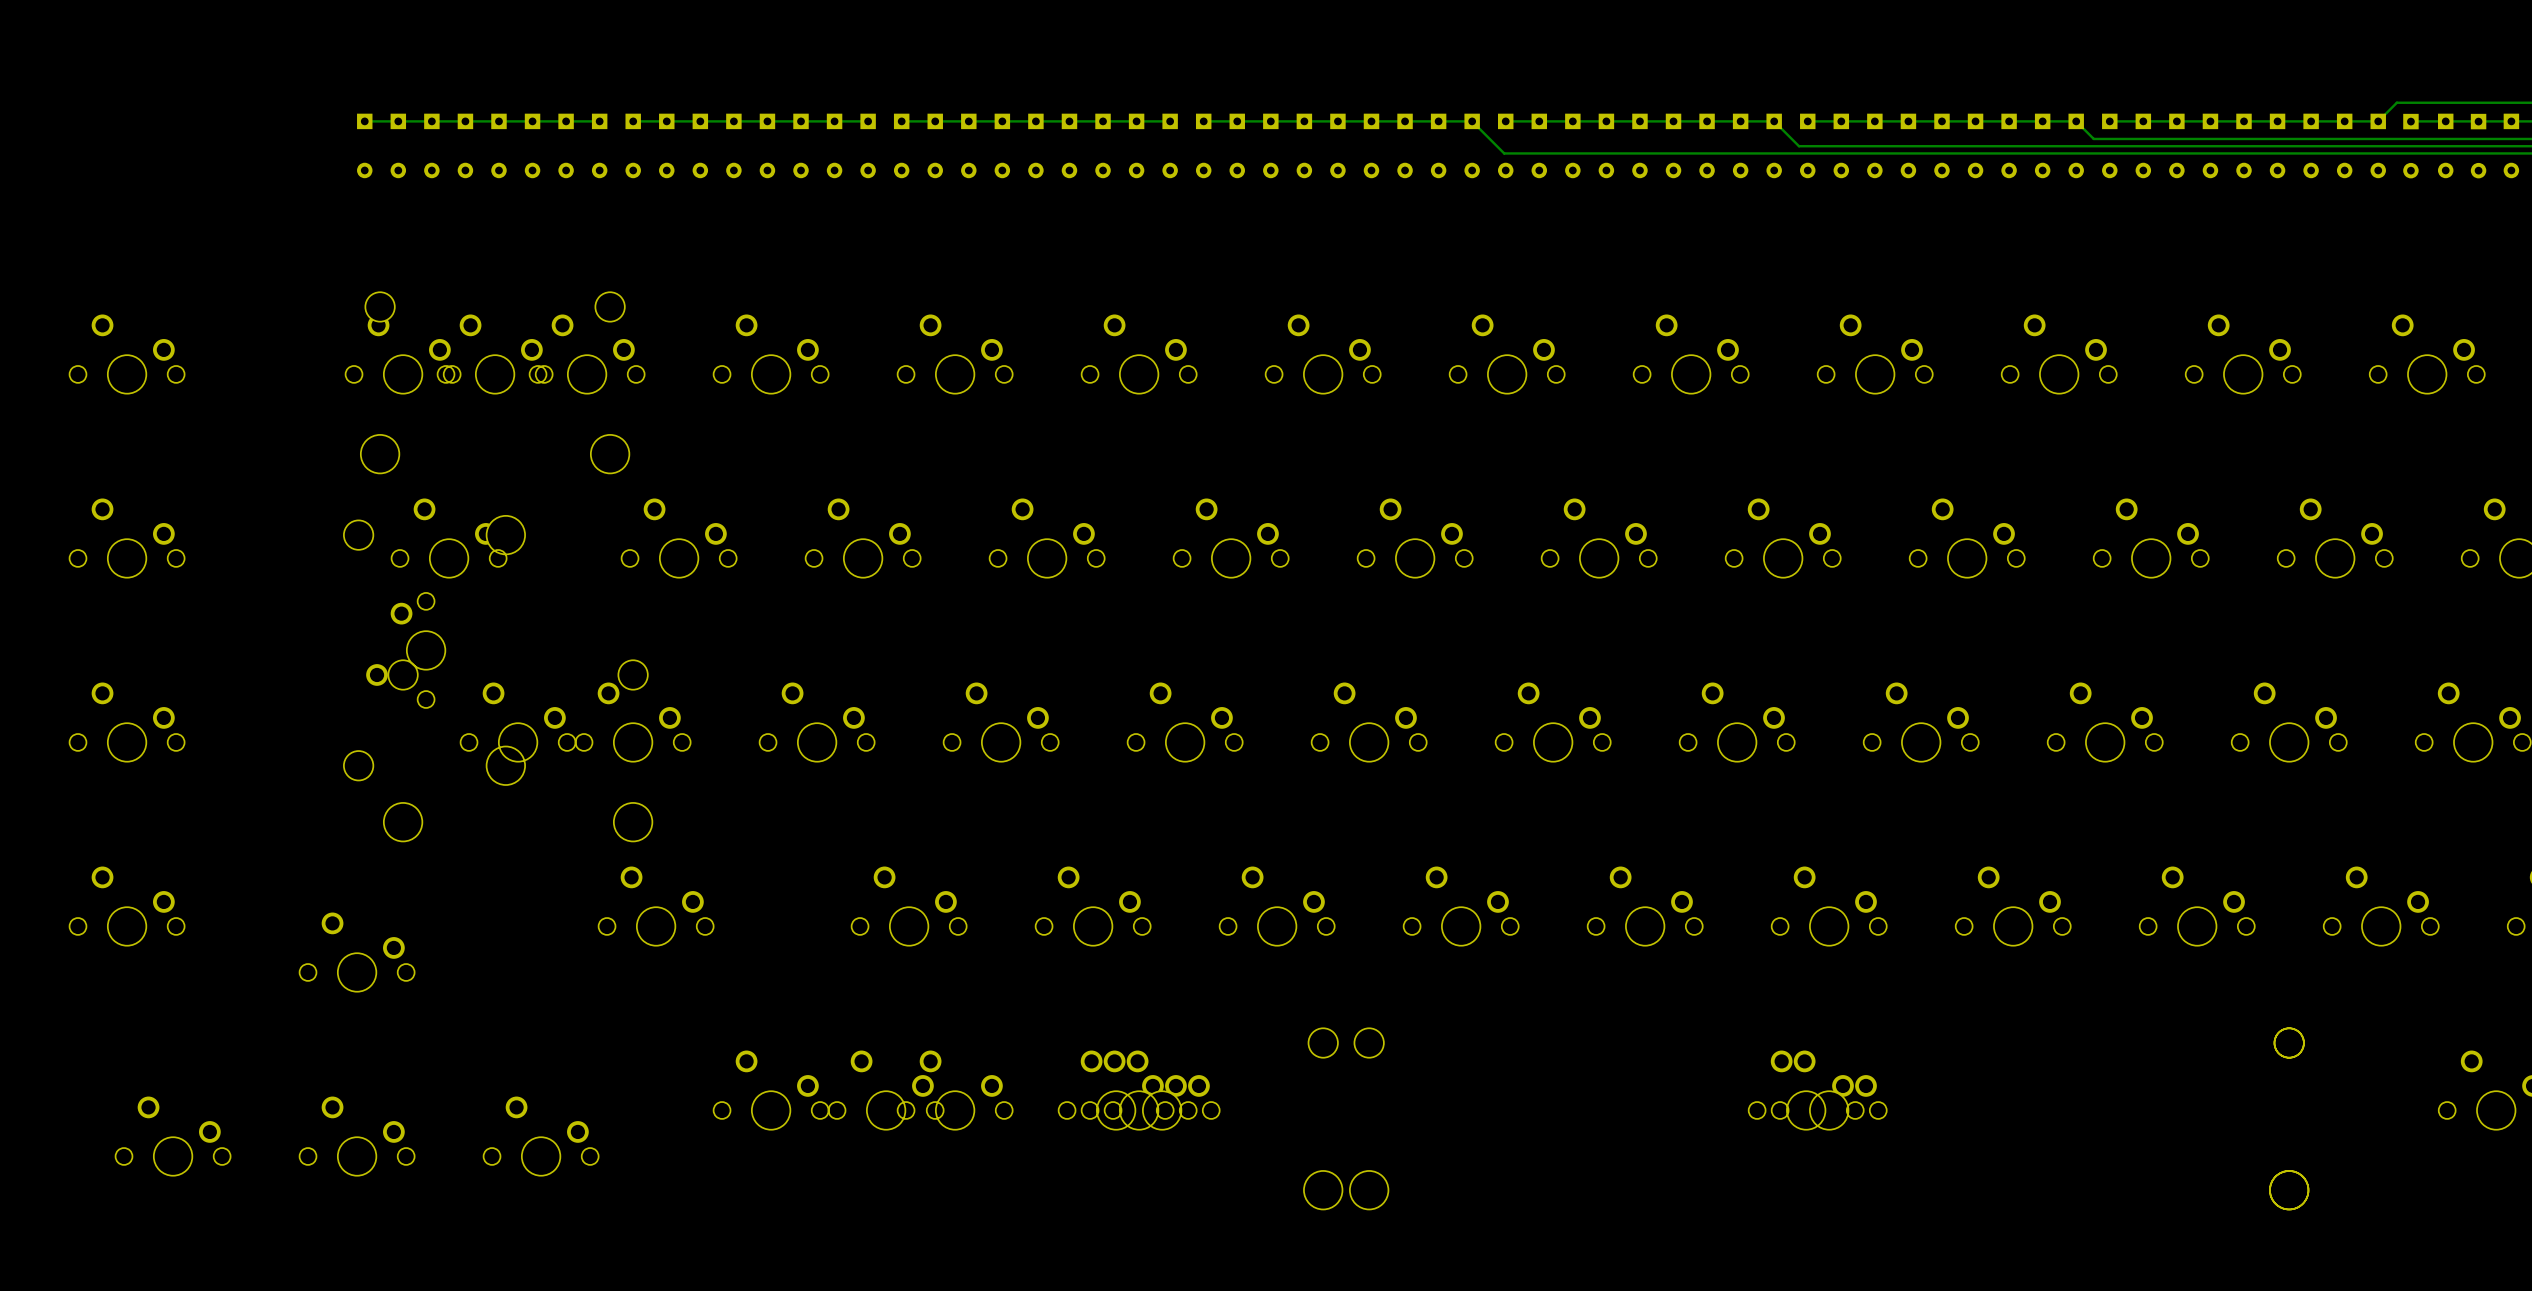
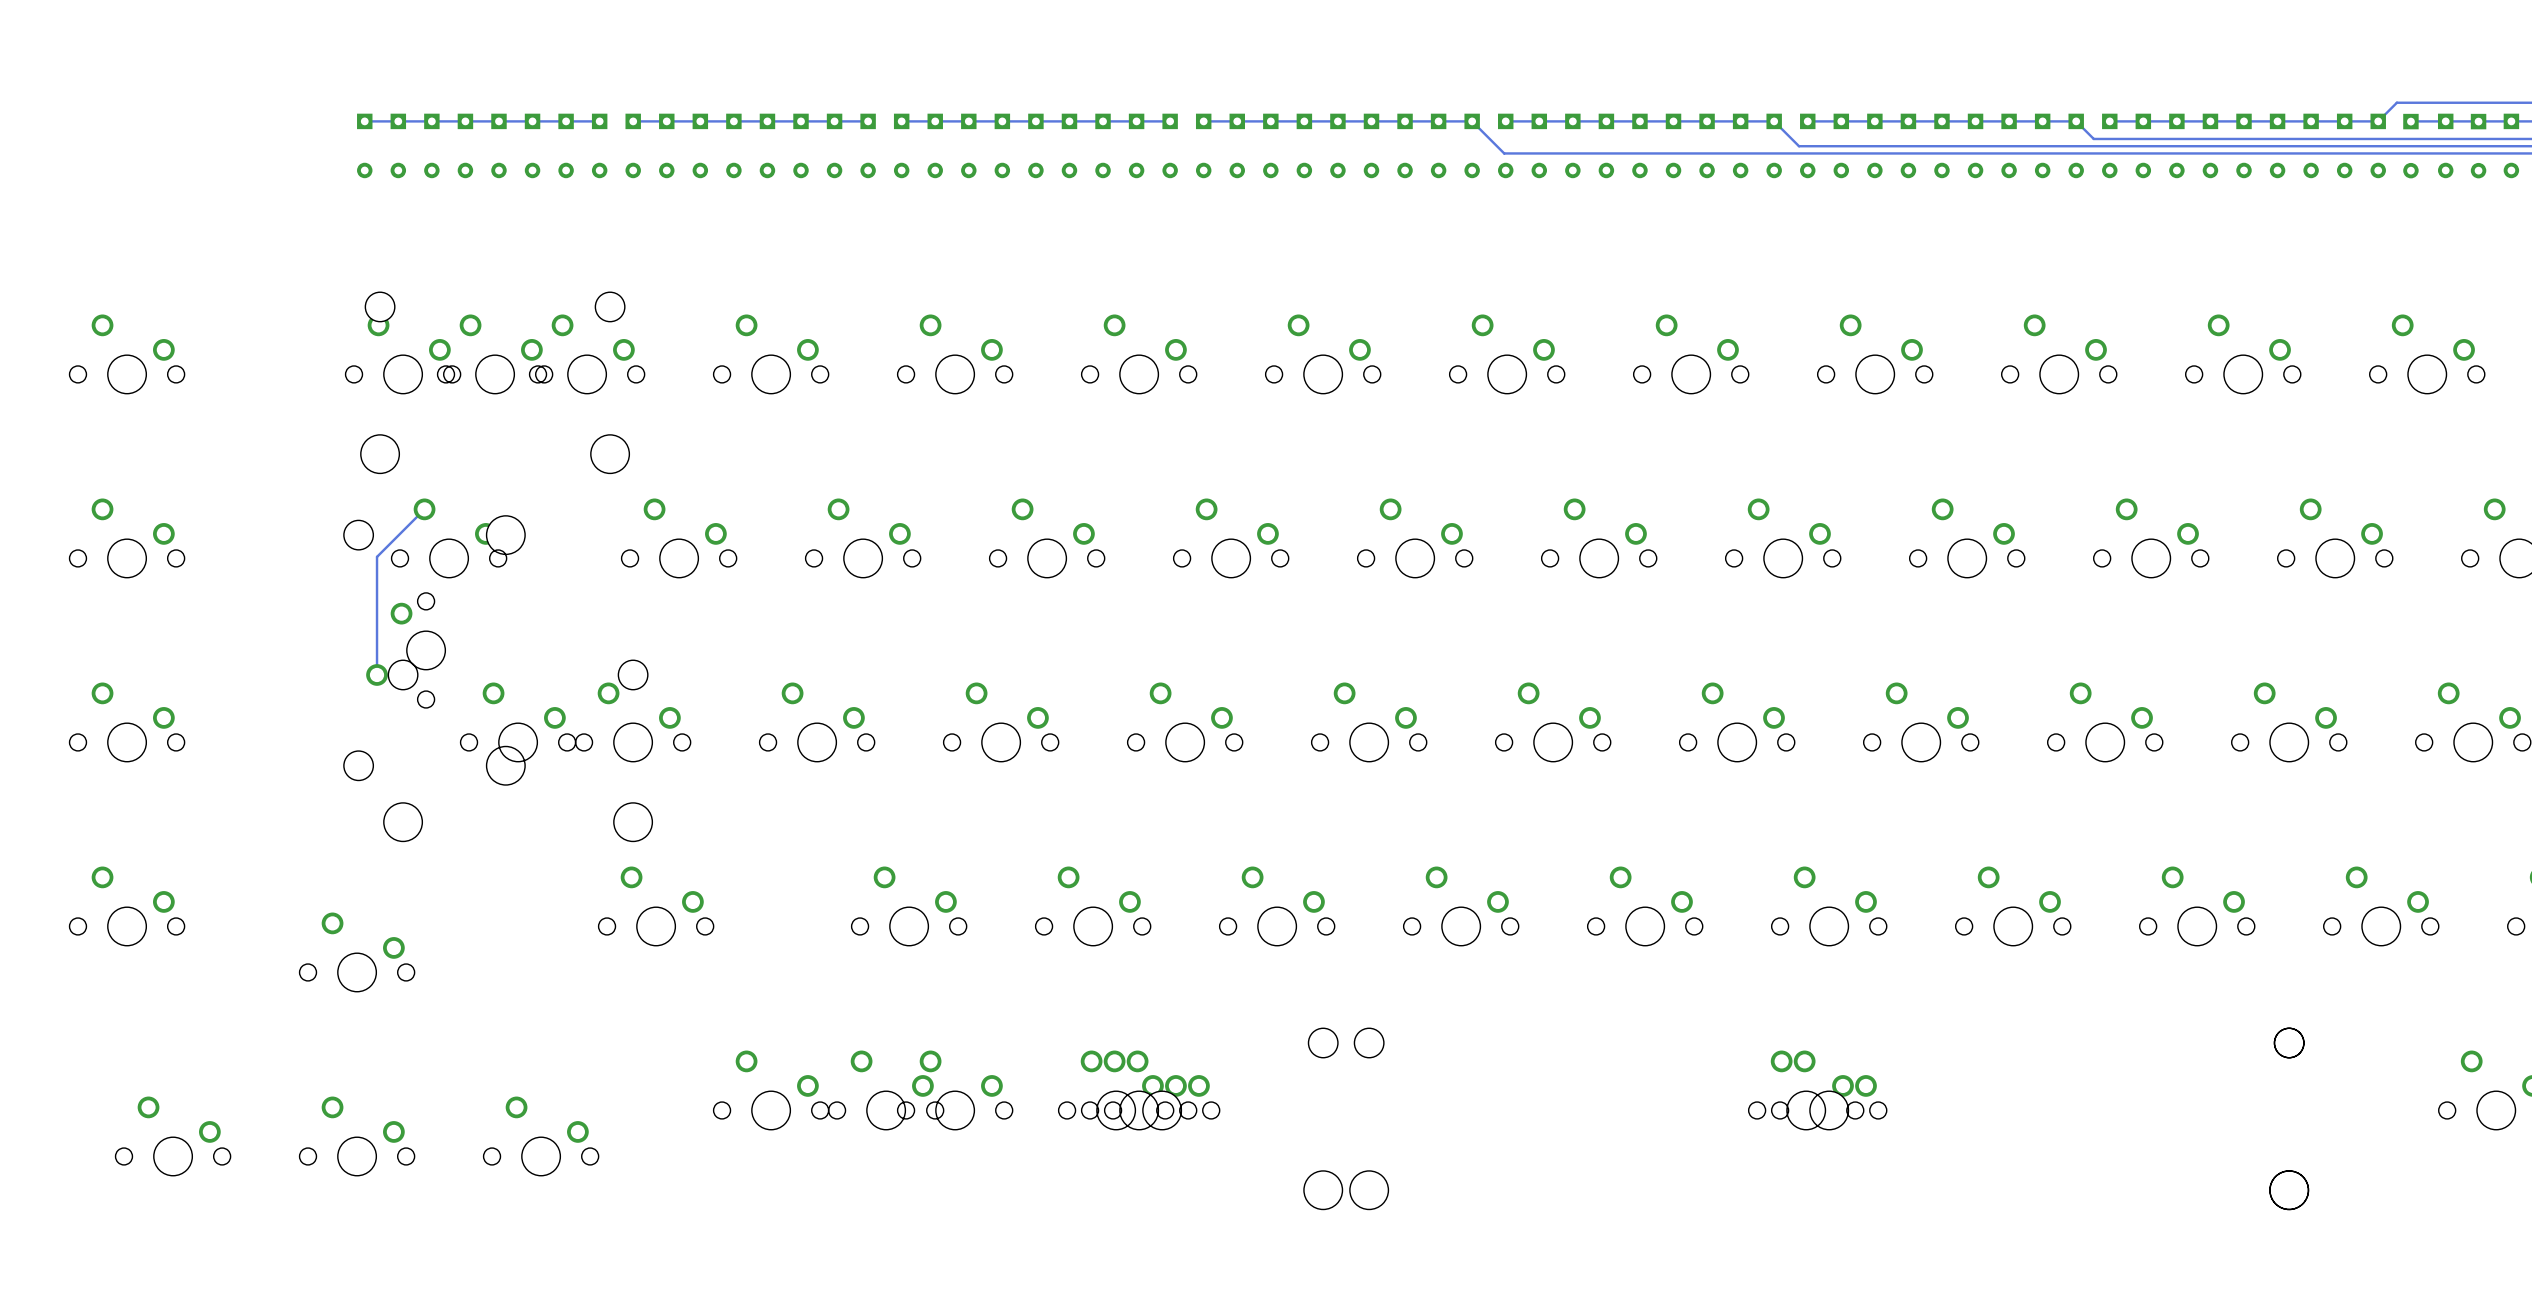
track: none -> (424, 509) (377, 556) (377, 674)

